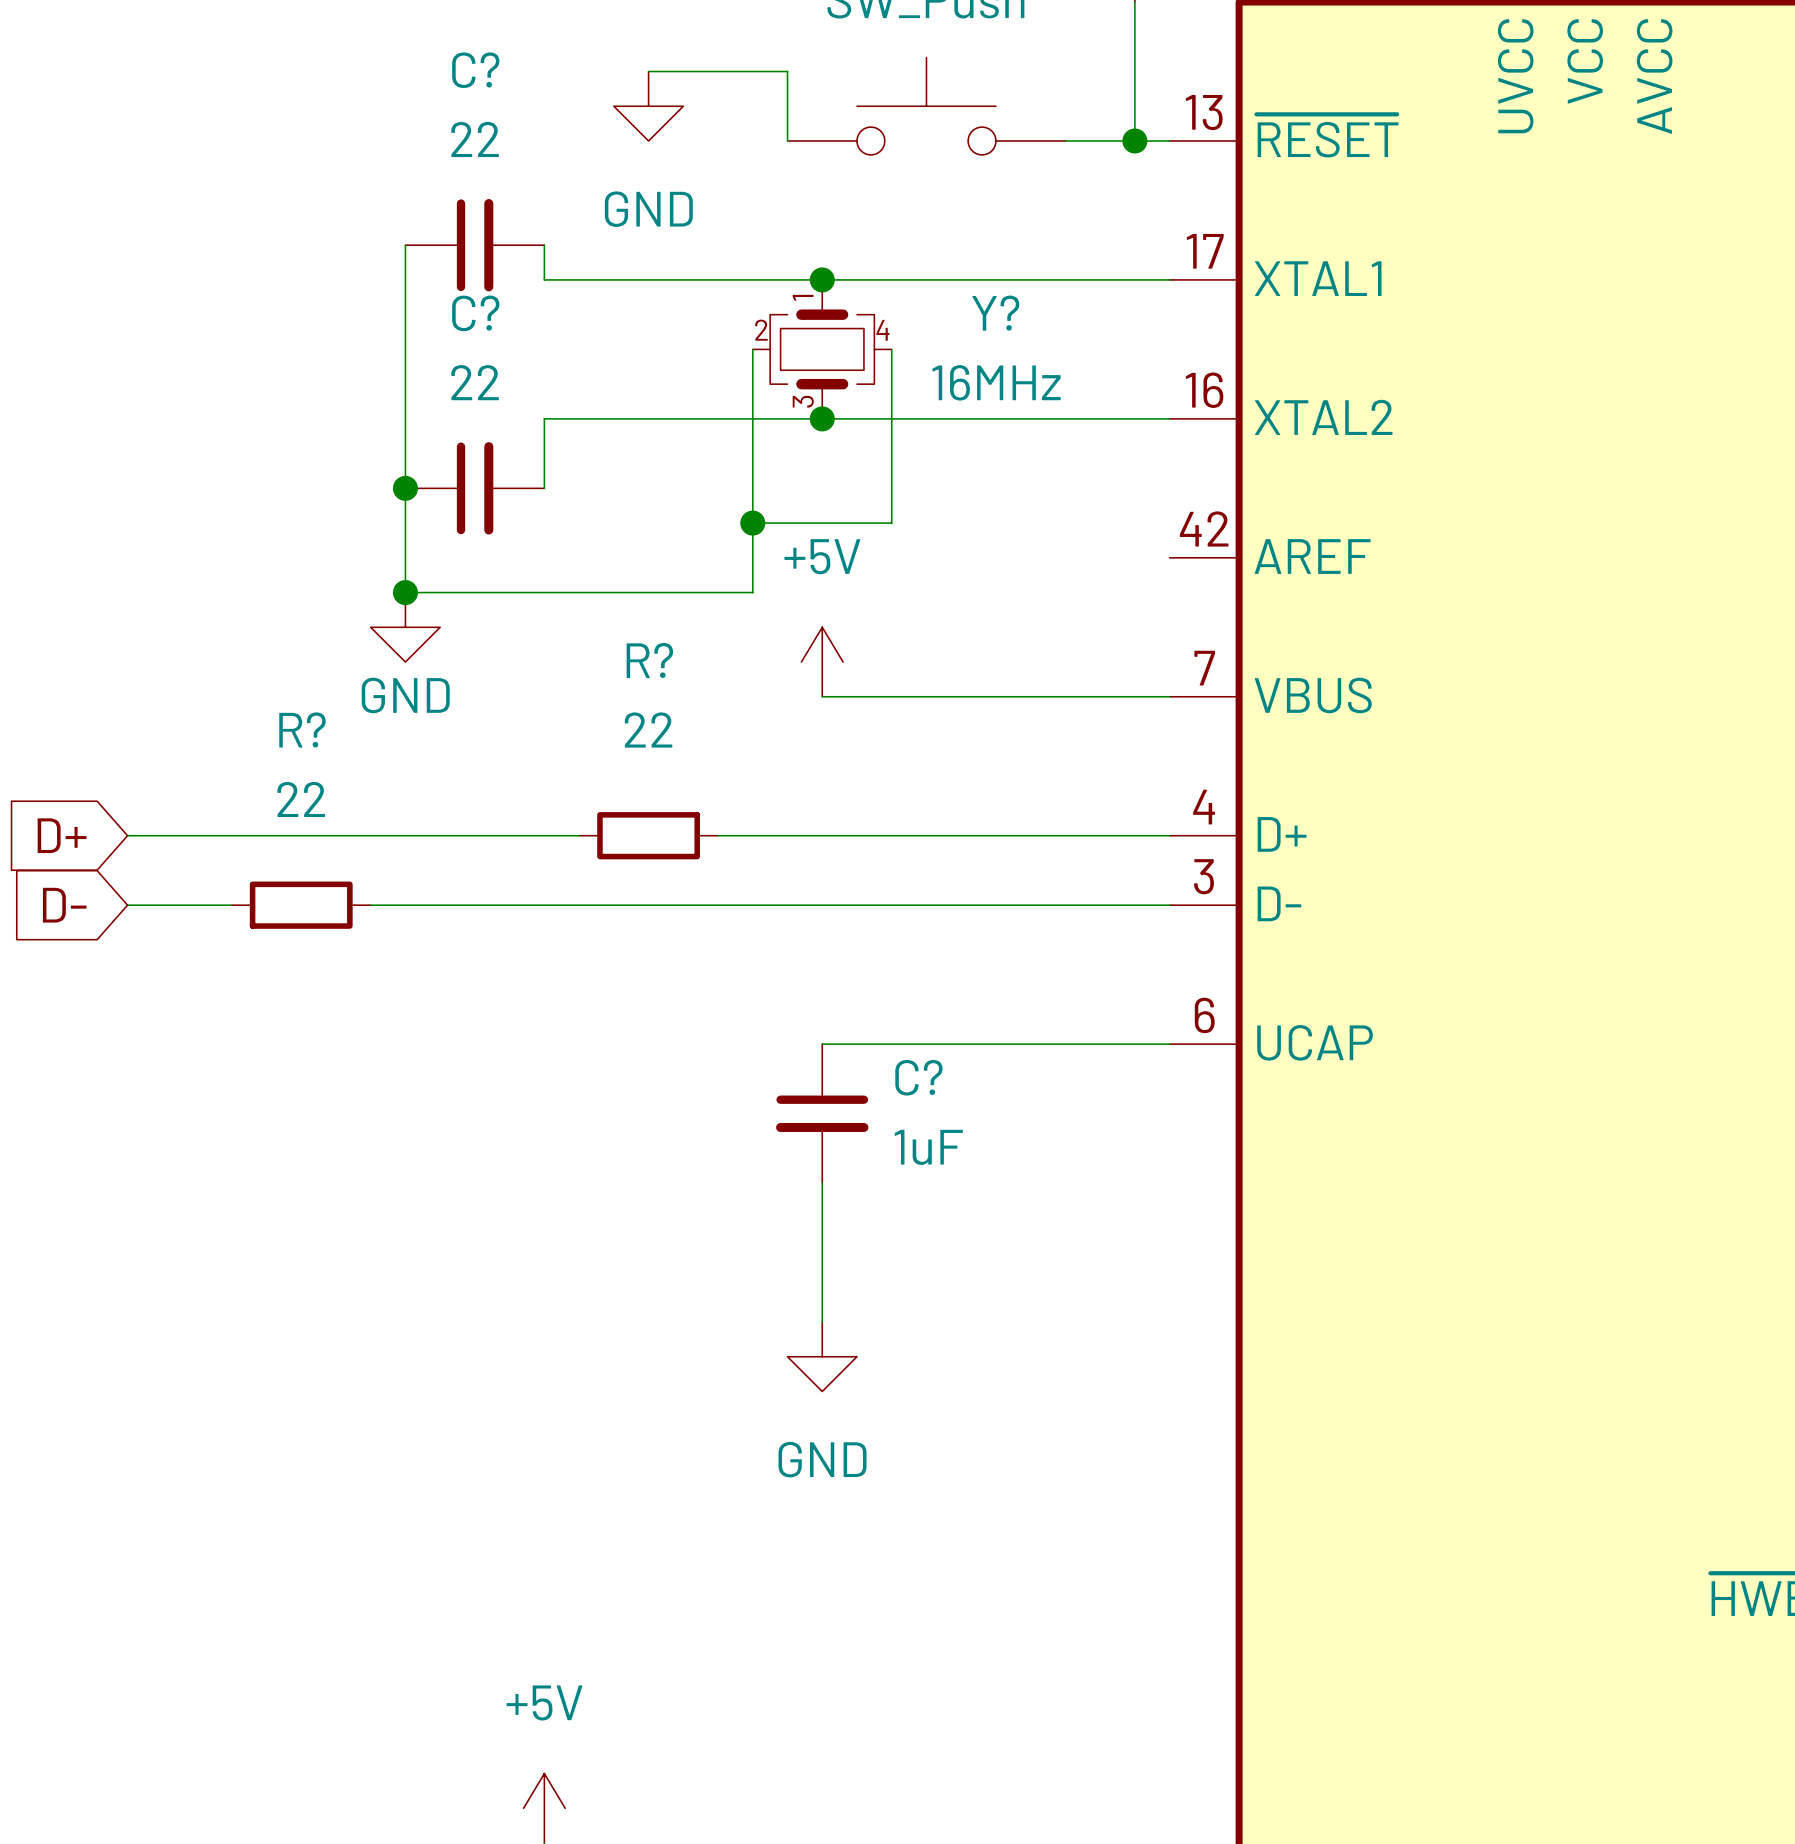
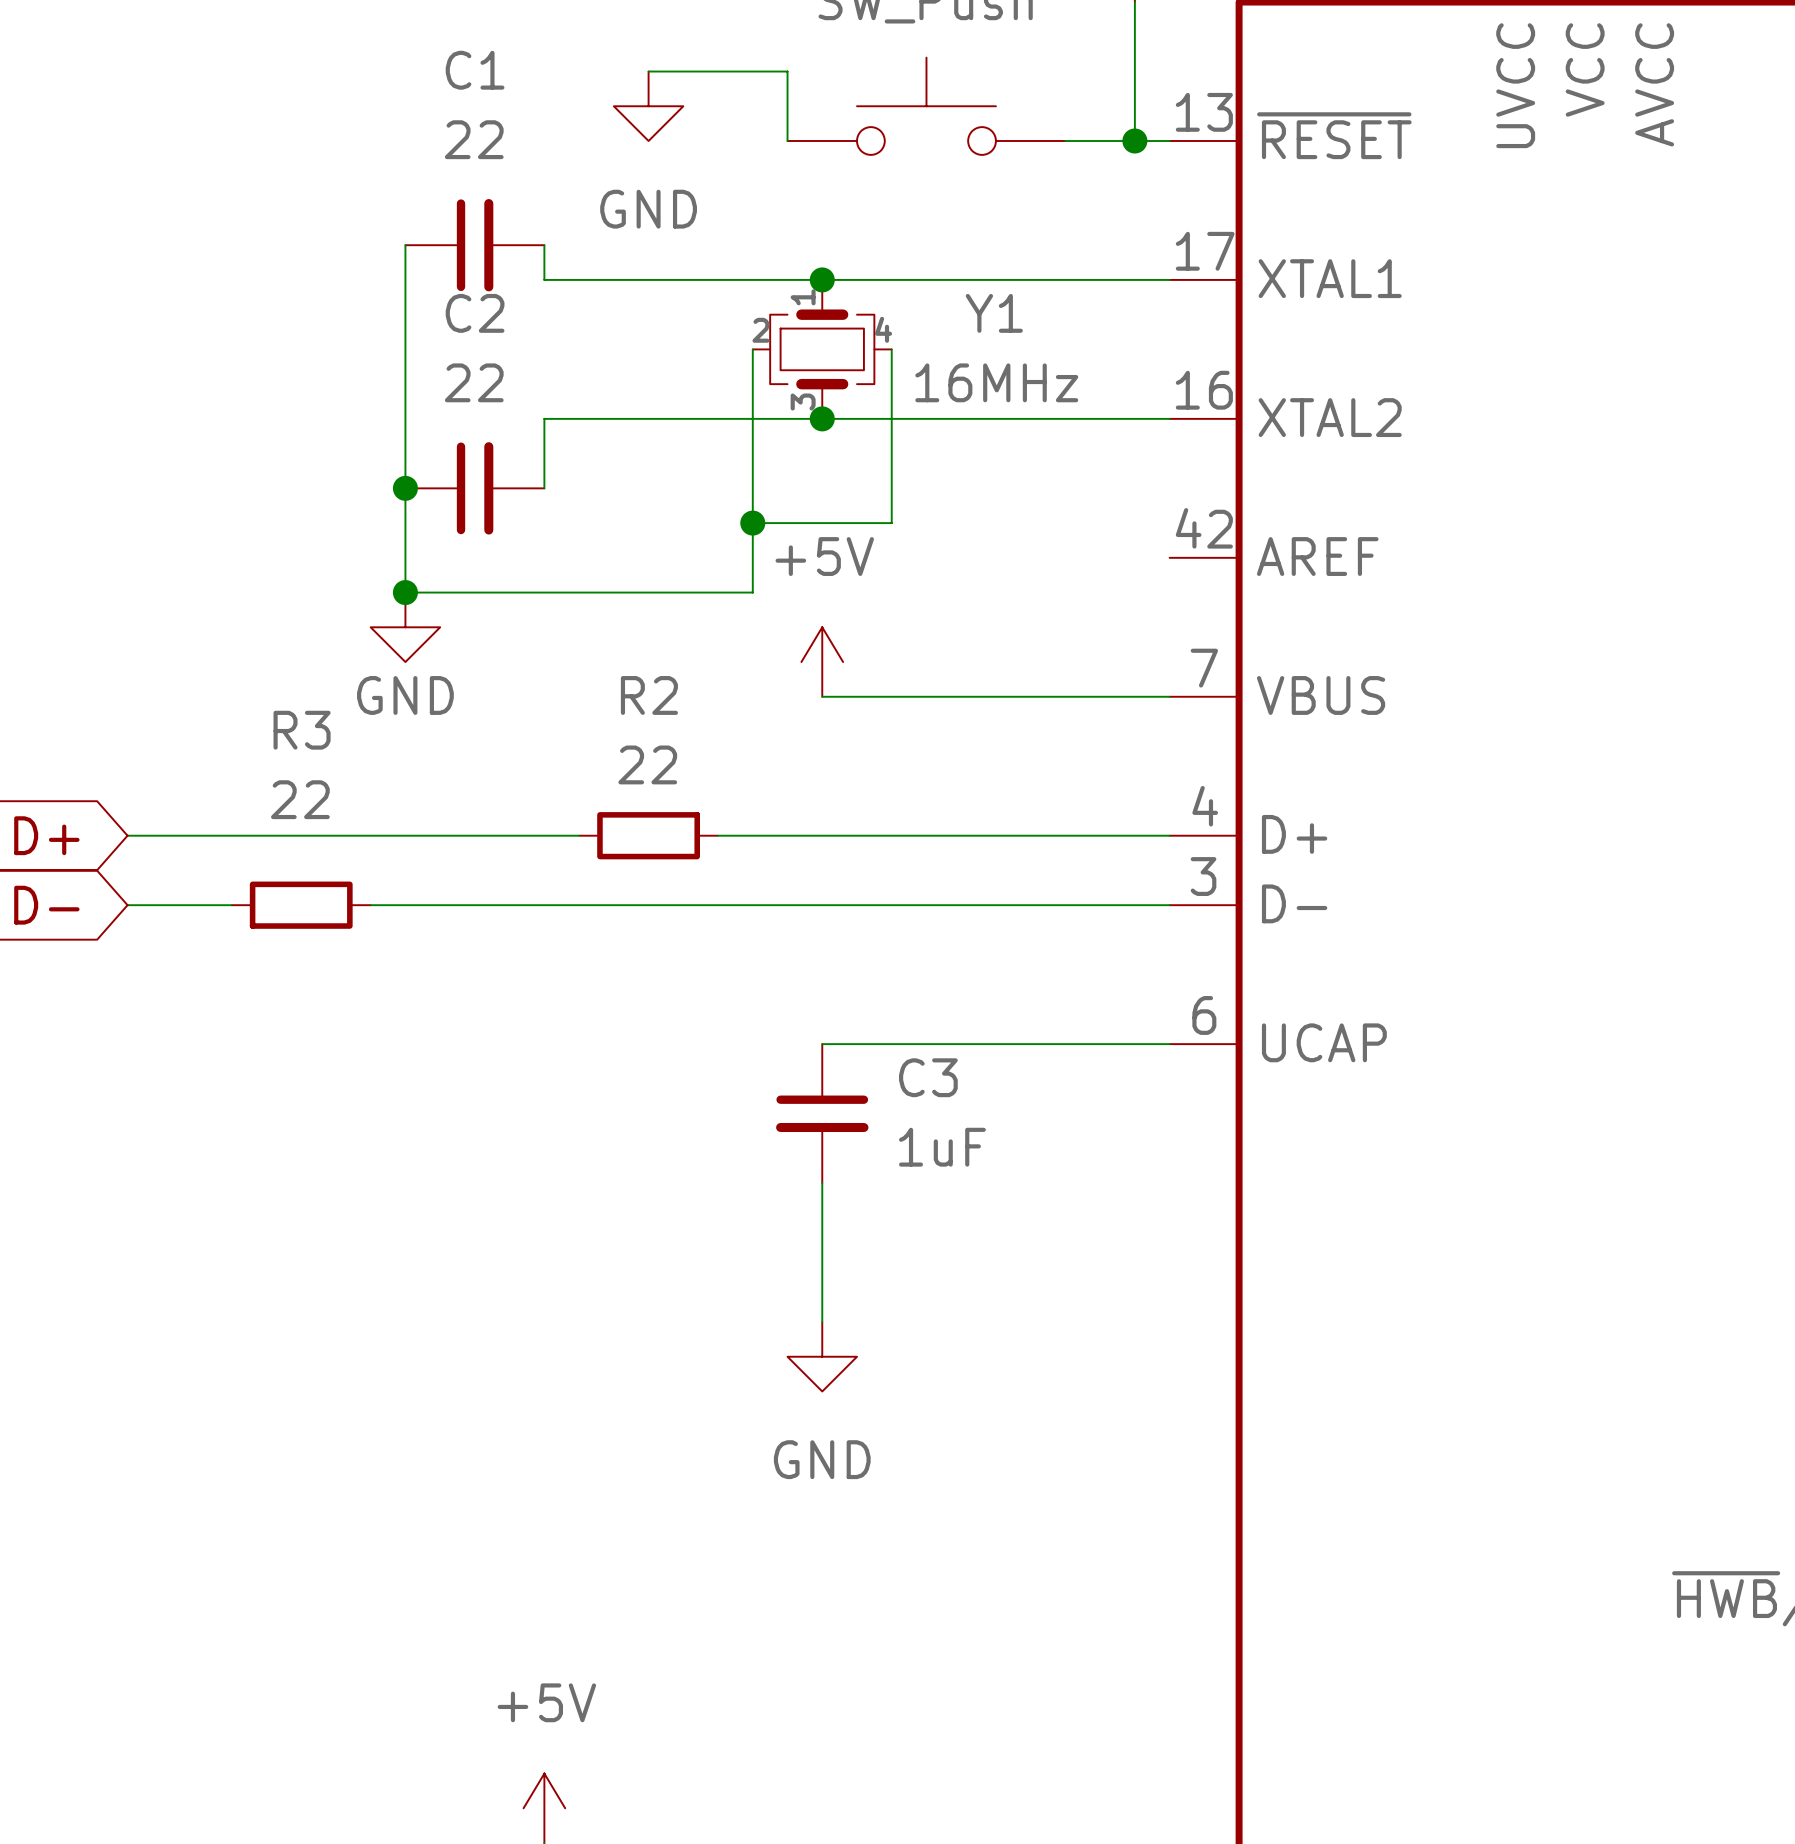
C? name: C? (475, 70) -> C1 (475, 70)
C? name: C? (475, 313) -> C2 (475, 313)
Y? name: Y? (995, 313) -> Y1 (994, 313)
R? name: R? (649, 660) -> R2 (649, 695)
R? name: R? (302, 729) -> R3 (302, 730)
R? value position: 22 (648, 730) -> 22 (647, 764)
C? name: C? (918, 1077) -> C3 (928, 1077)

